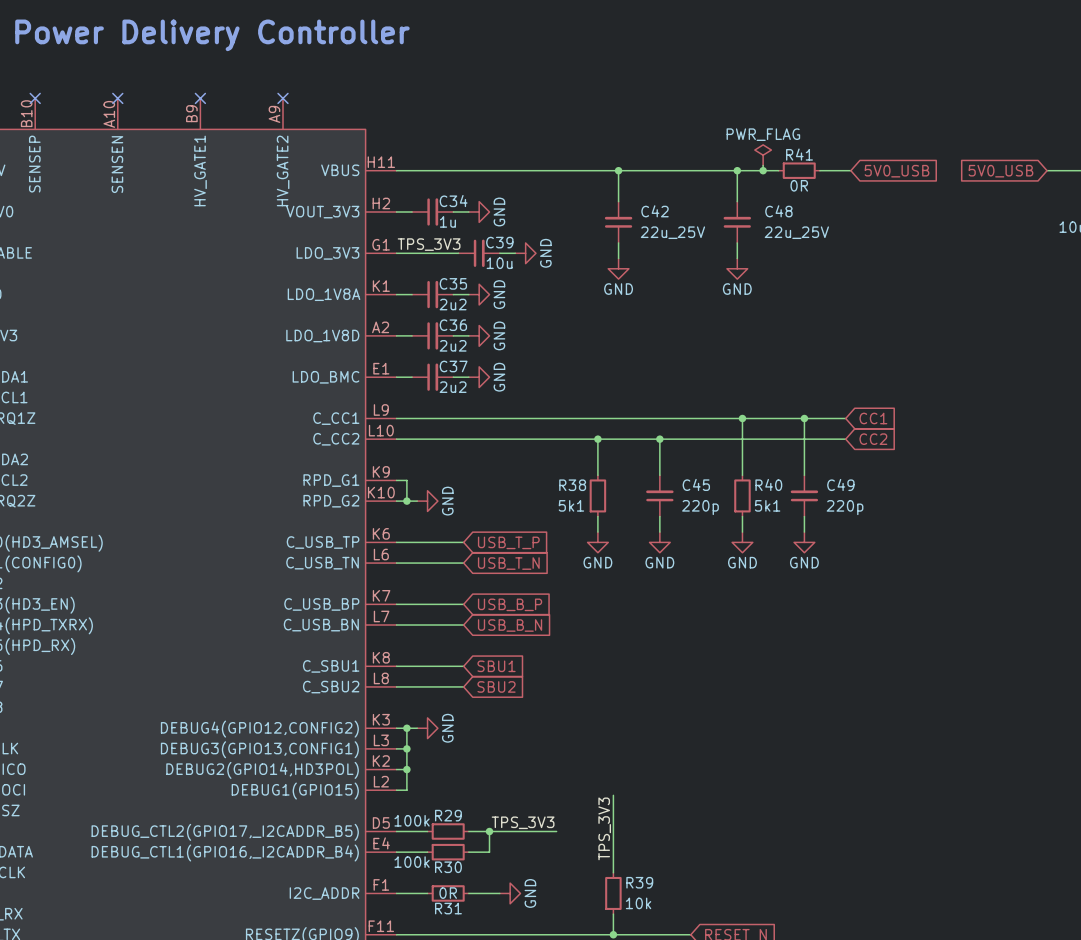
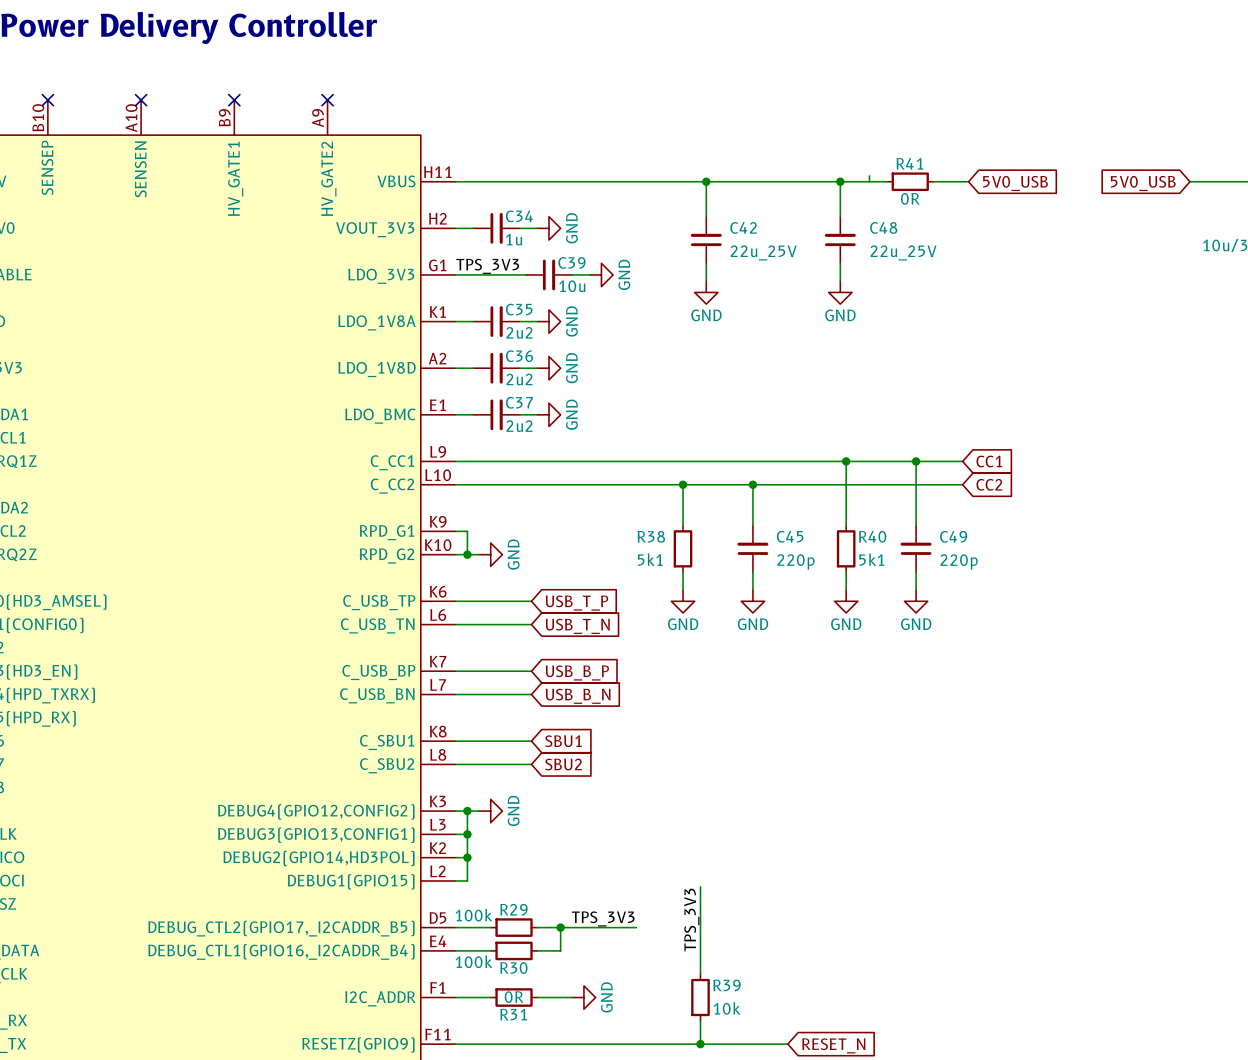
power symbol: PWR_FLAG (763, 155) -> none
junction: (763, 170) -> none

